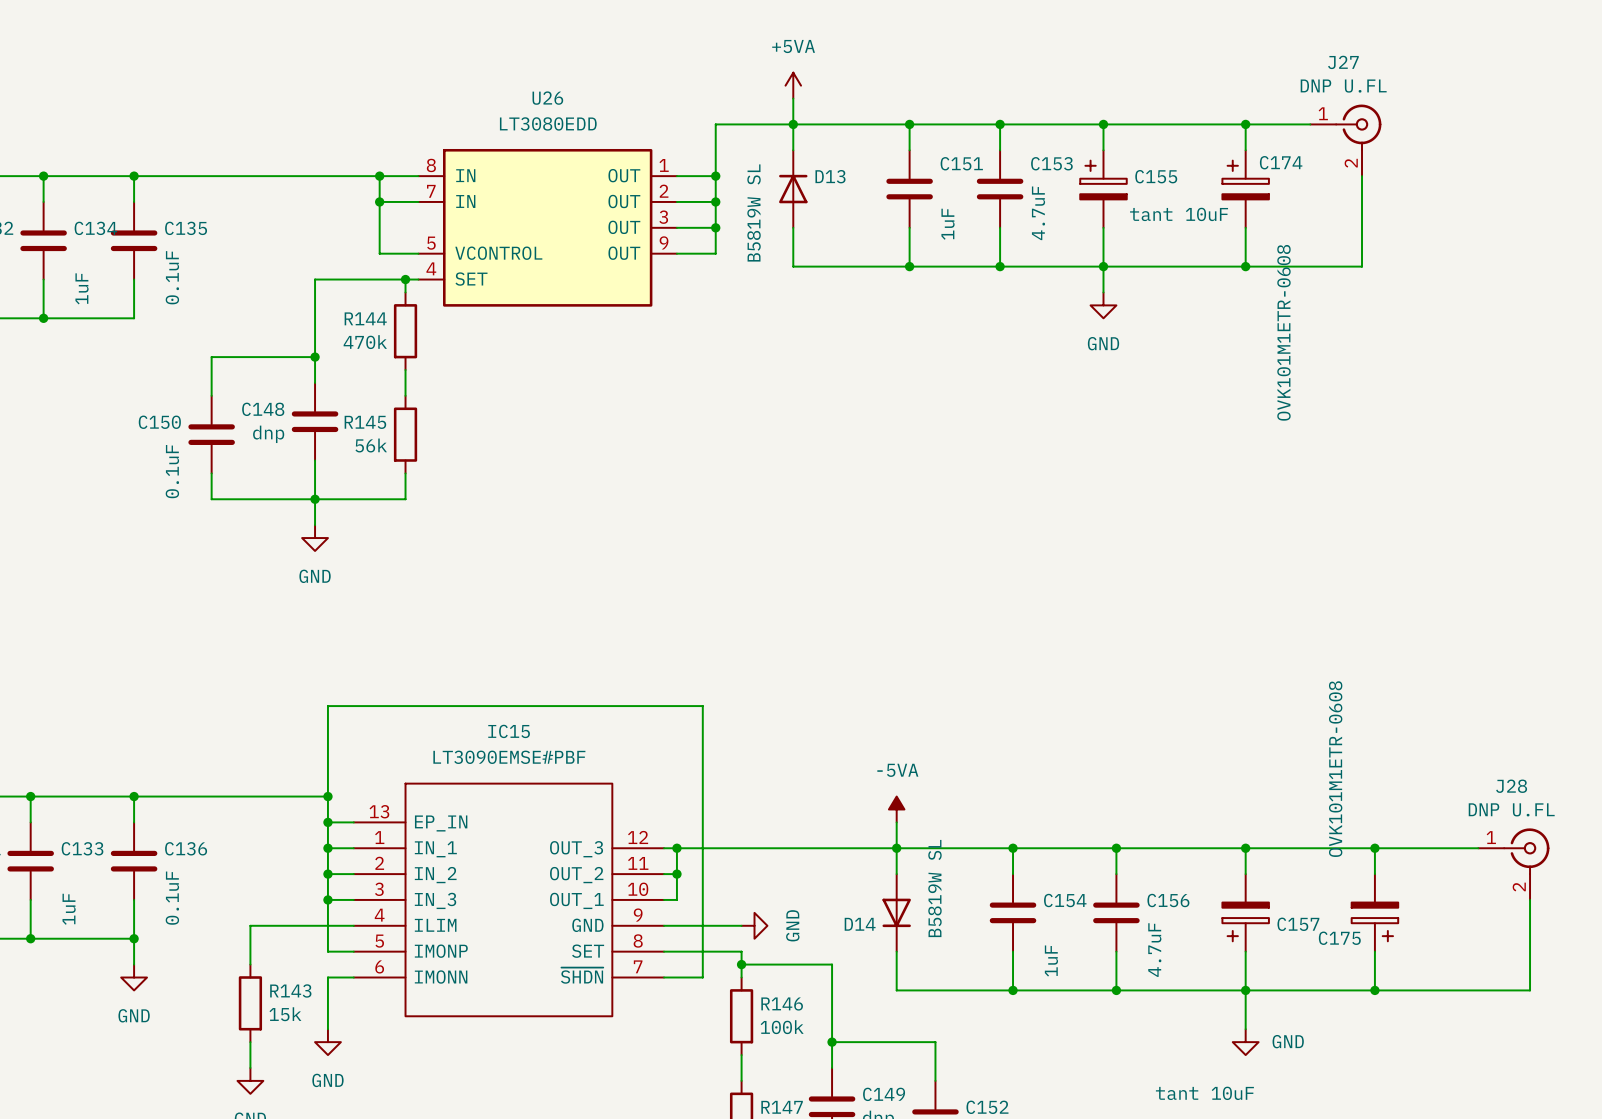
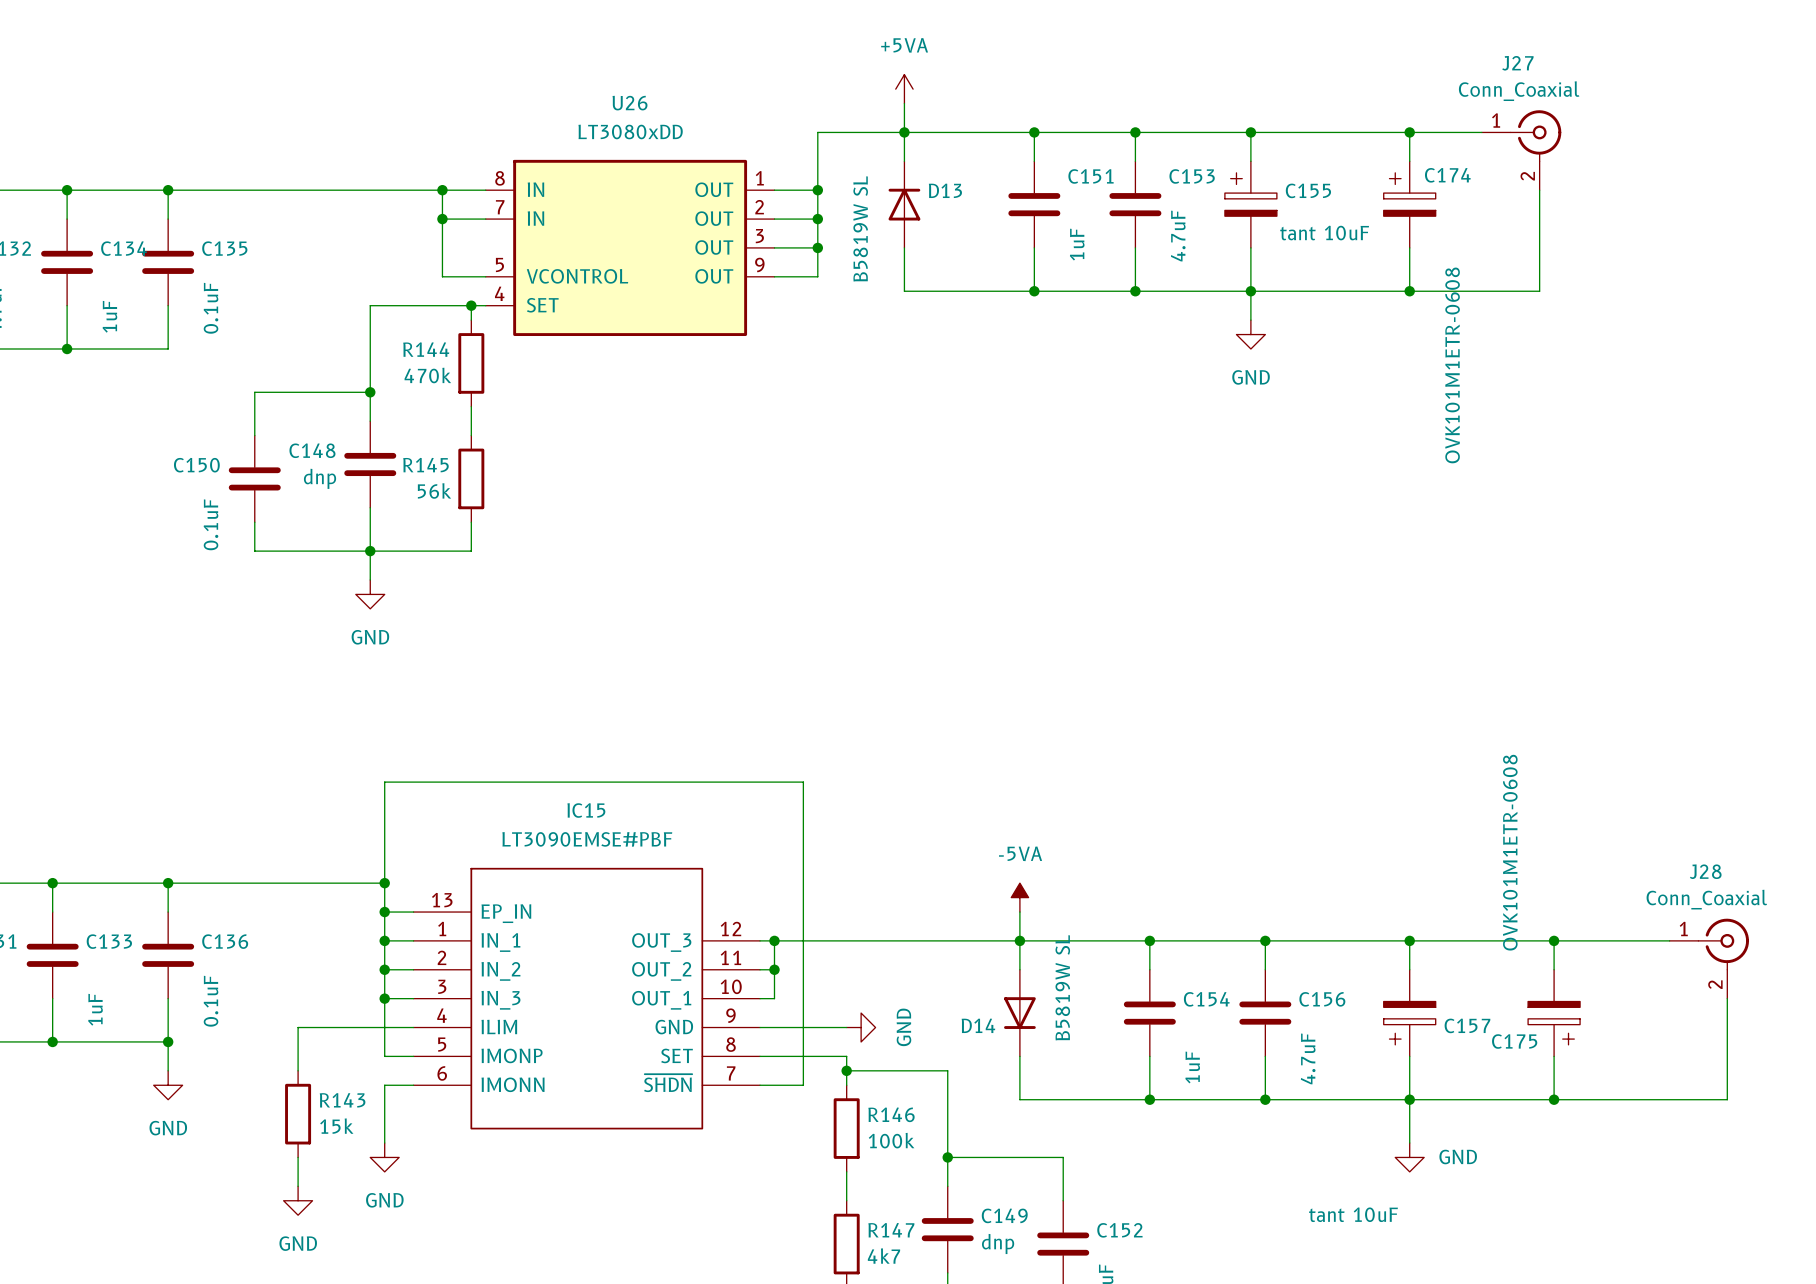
J27 value: DNP U.FL (1343, 86) -> Conn_Coaxial (1519, 91)
U26 value: LT3080EDD (548, 123) -> LT3080xDD (630, 131)
J28 value: DNP U.FL (1511, 809) -> Conn_Coaxial (1706, 899)

